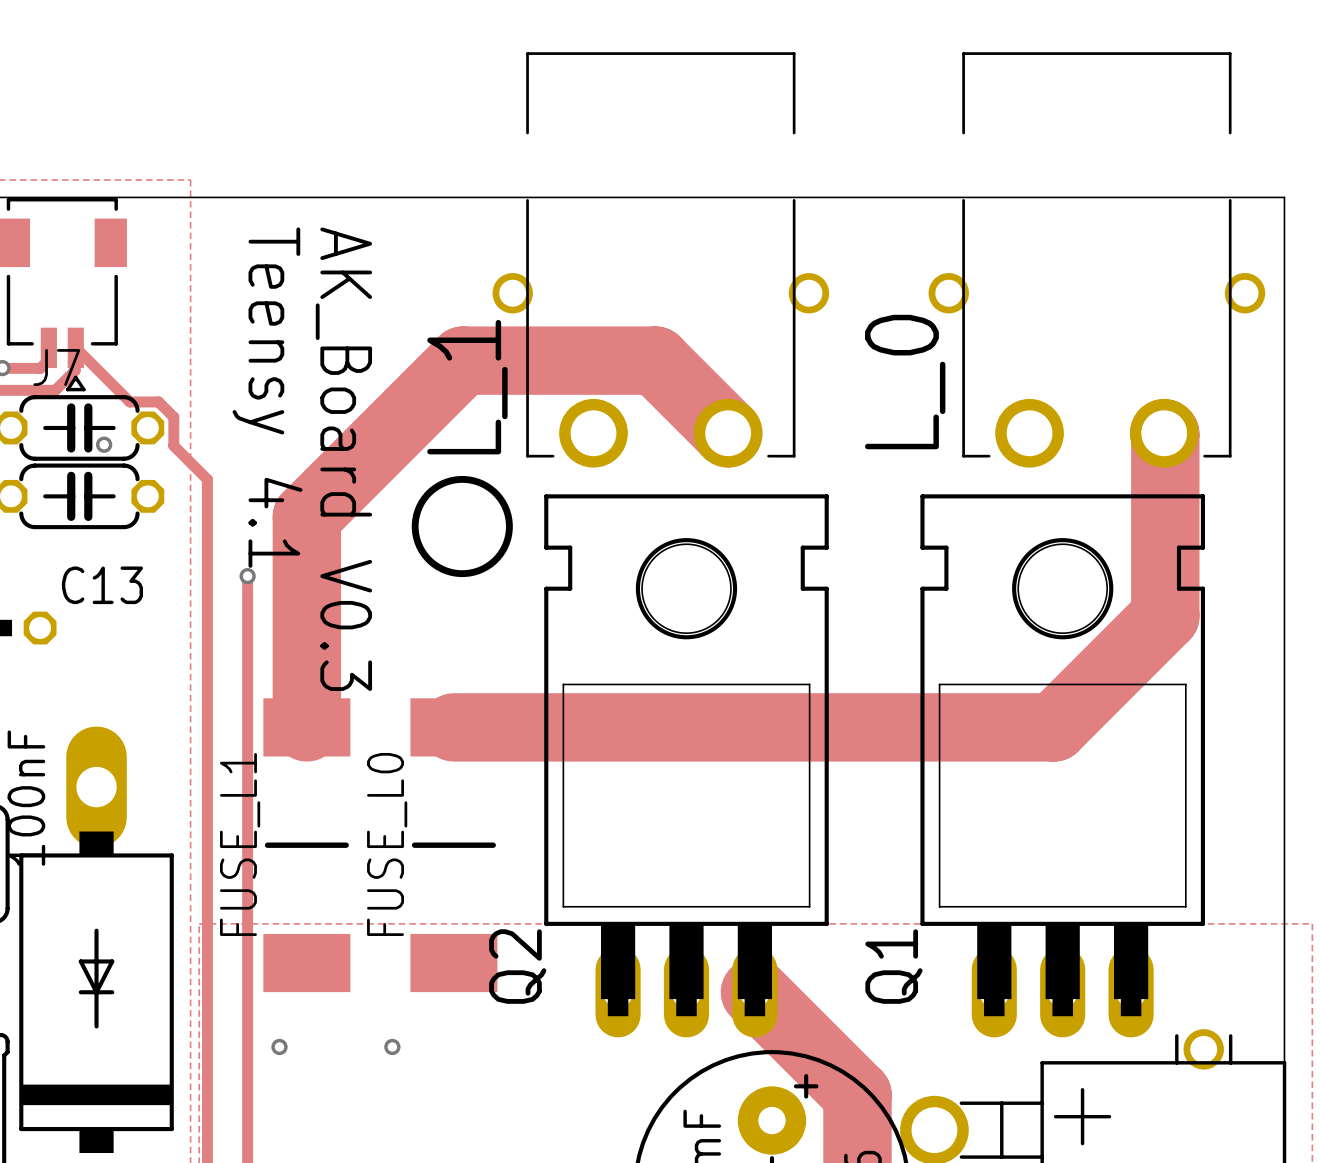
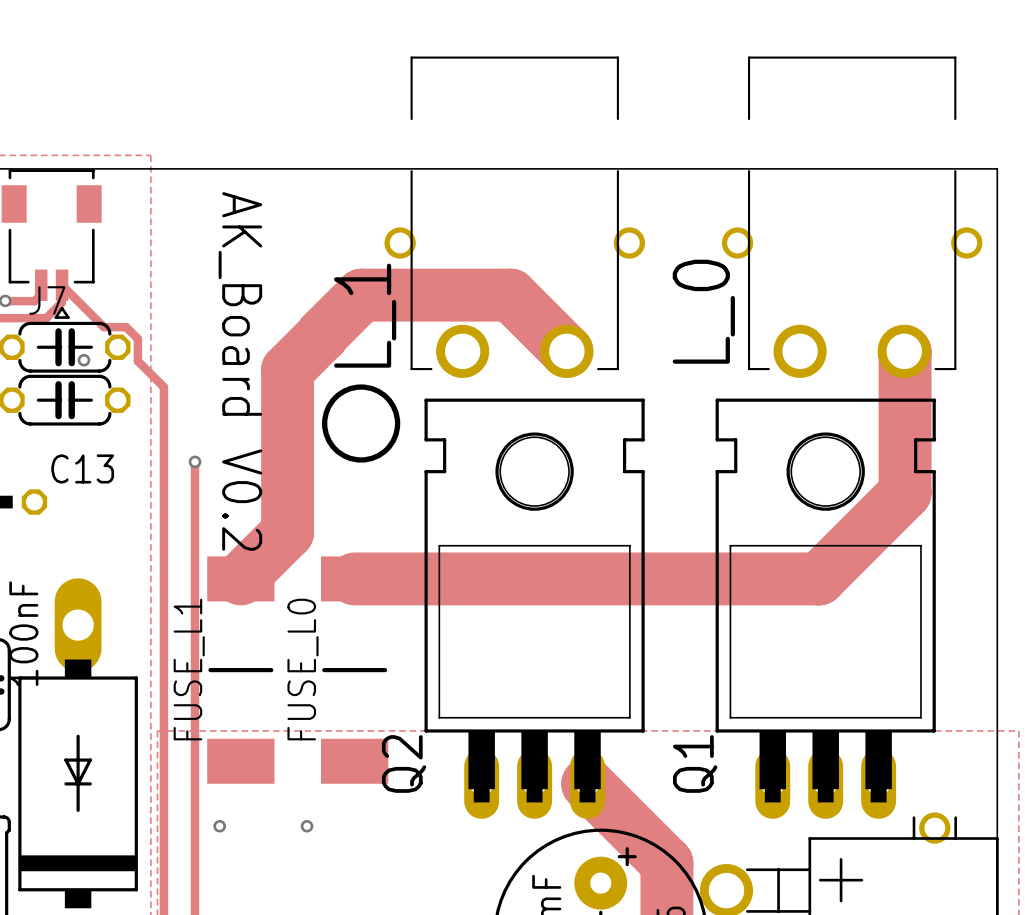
text: Teensy 4.1 (267, 397) -> none
track: (412, 410) (306, 516) (306, 727) -> (322, 334) (287, 370) (287, 532) (240, 578)
text: AK_Board V0.3 (343, 459) -> AK_Board V0.2 (240, 371)

